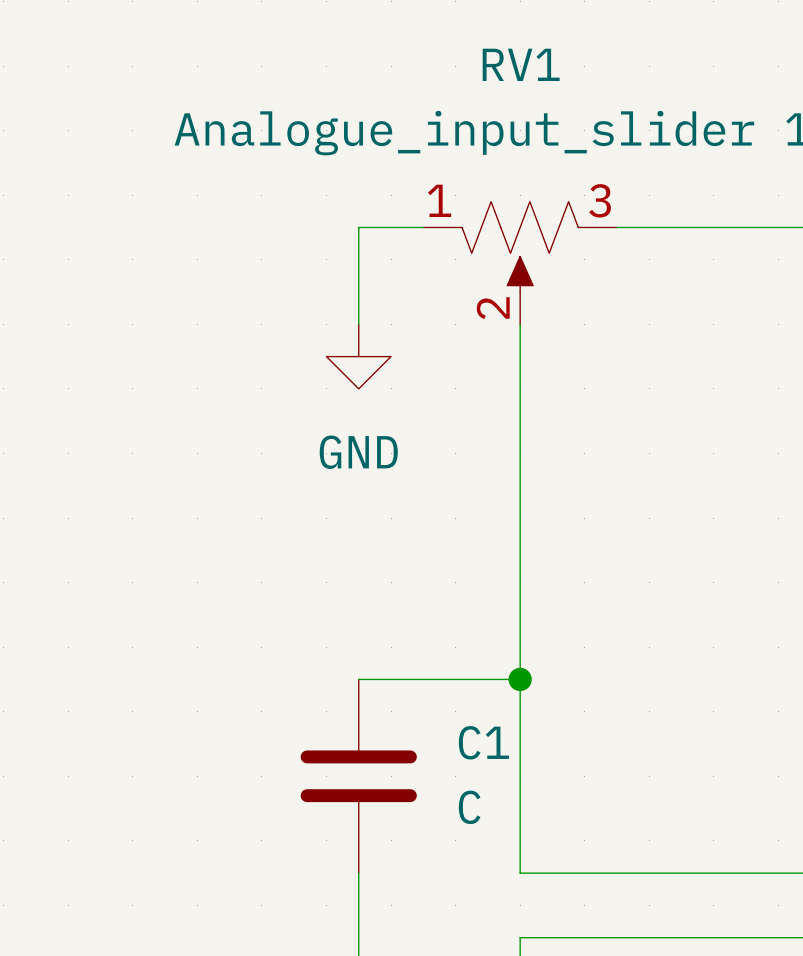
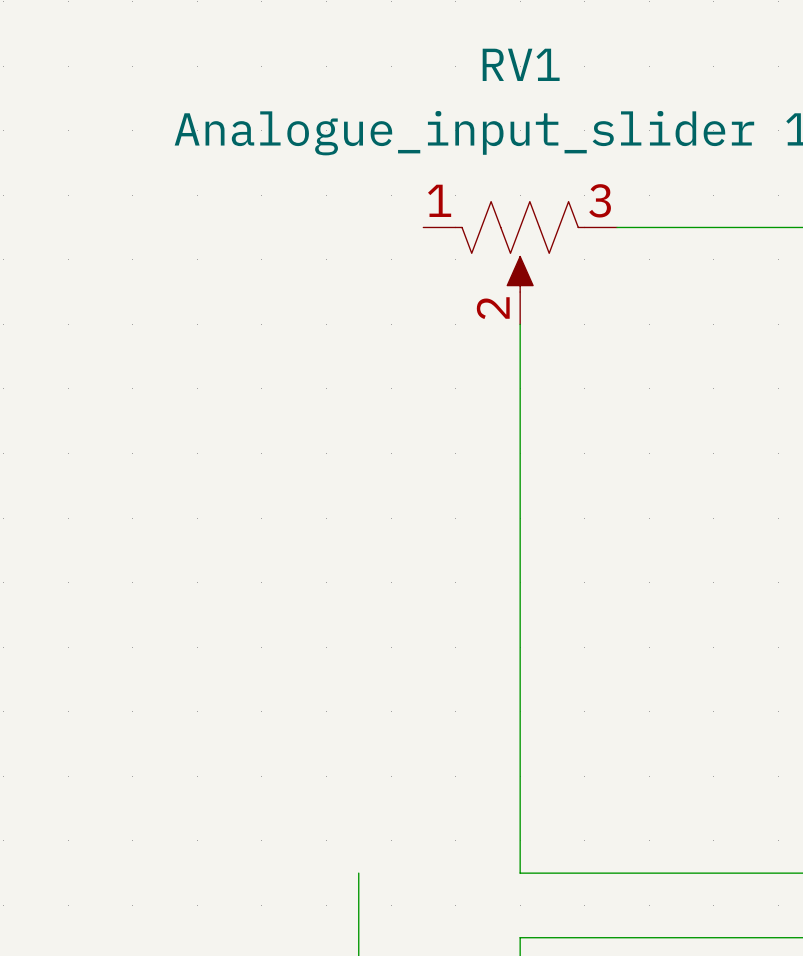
wire: (423, 227) (358, 227) (358, 324) -> none
power symbol: GND (358, 356) -> none
wire: (358, 679) (520, 679) -> none
junction: (520, 679) -> none
C1: C (358, 776) -> none

